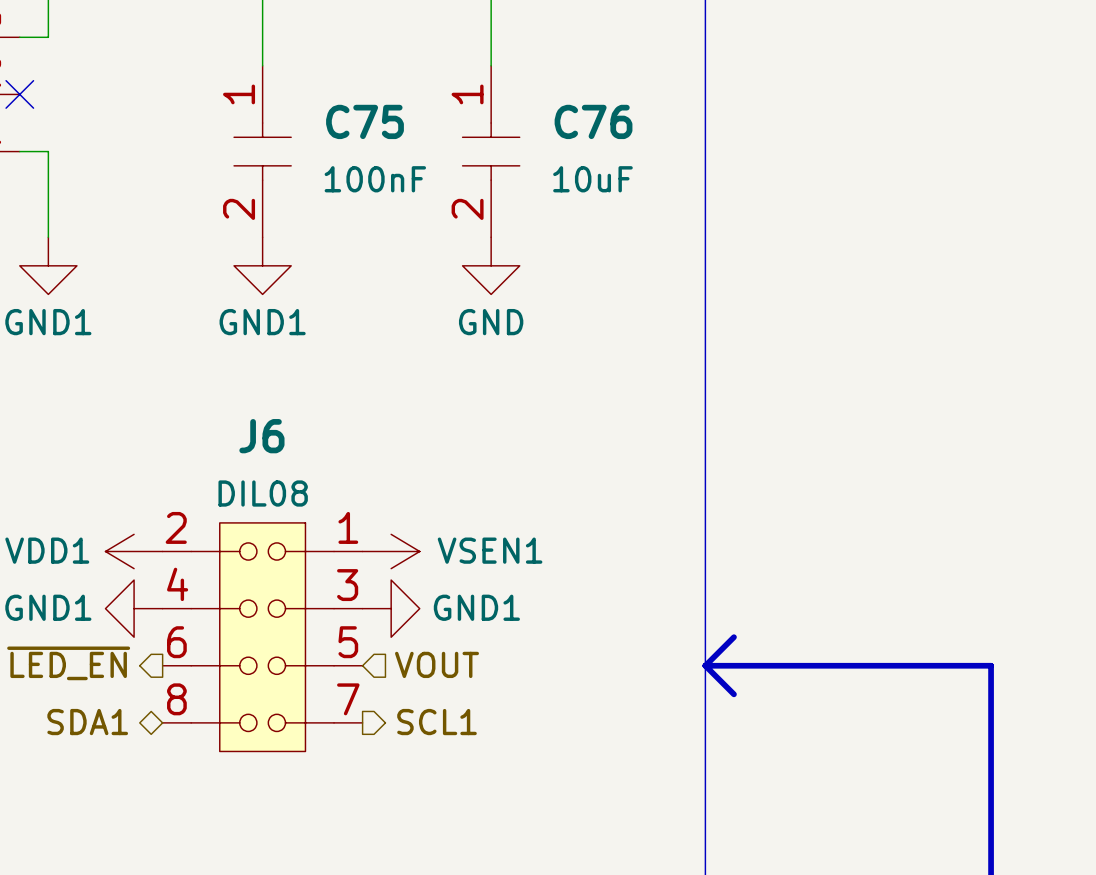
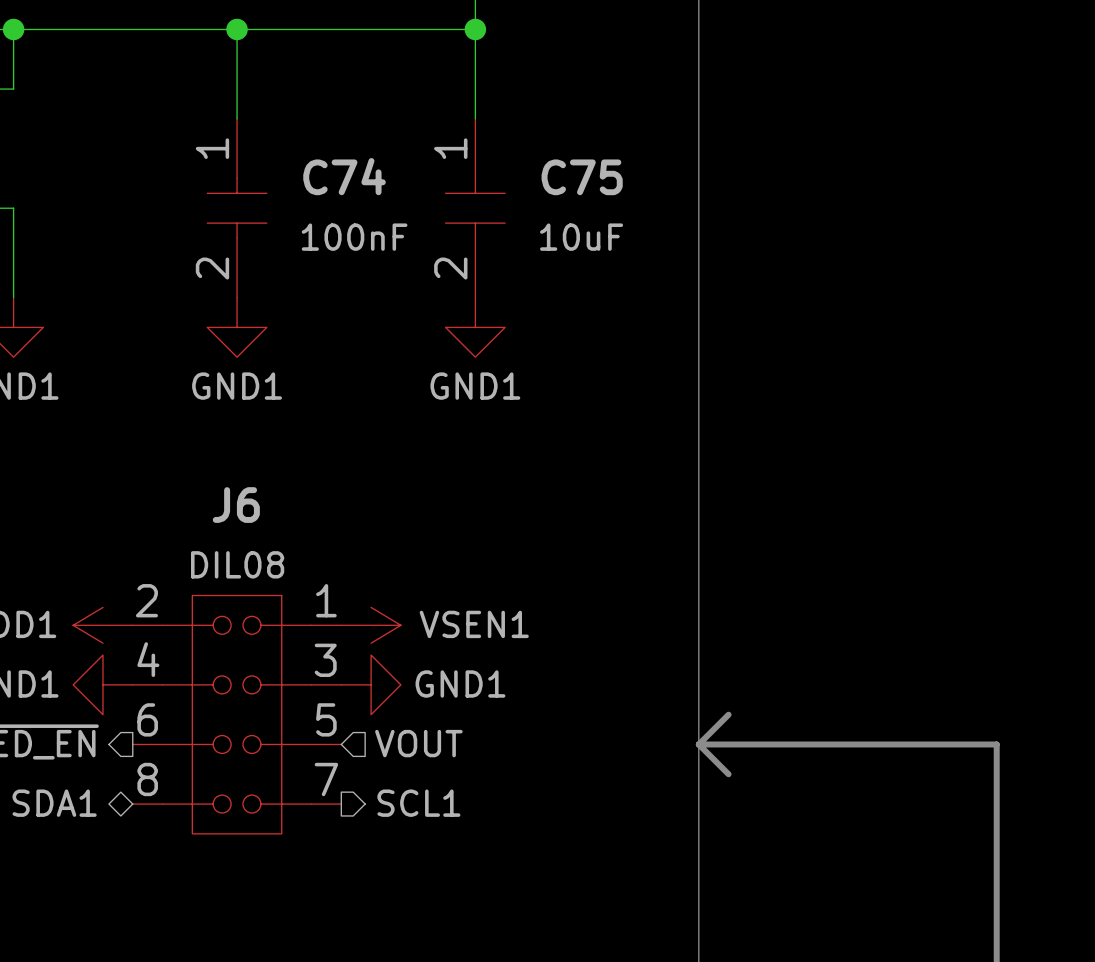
C75 name: C75 (364, 121) -> C74 (344, 176)
C76 name: C76 (593, 121) -> C75 (582, 177)
power symbol: GND (491, 265) -> GND1 (475, 327)

